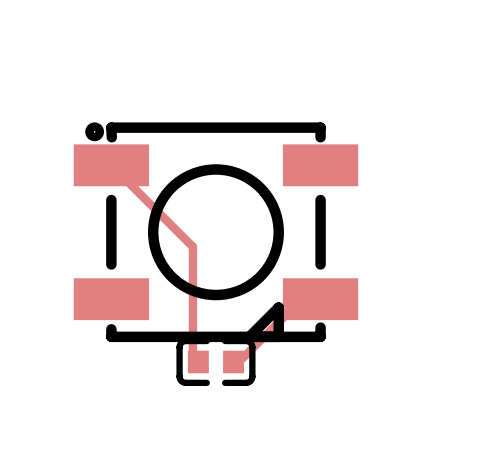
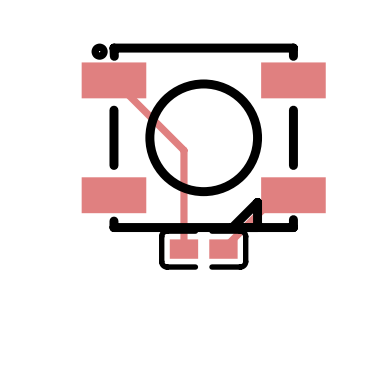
part footprint: [176, 337, 256, 387] -> [159, 228, 249, 270]

